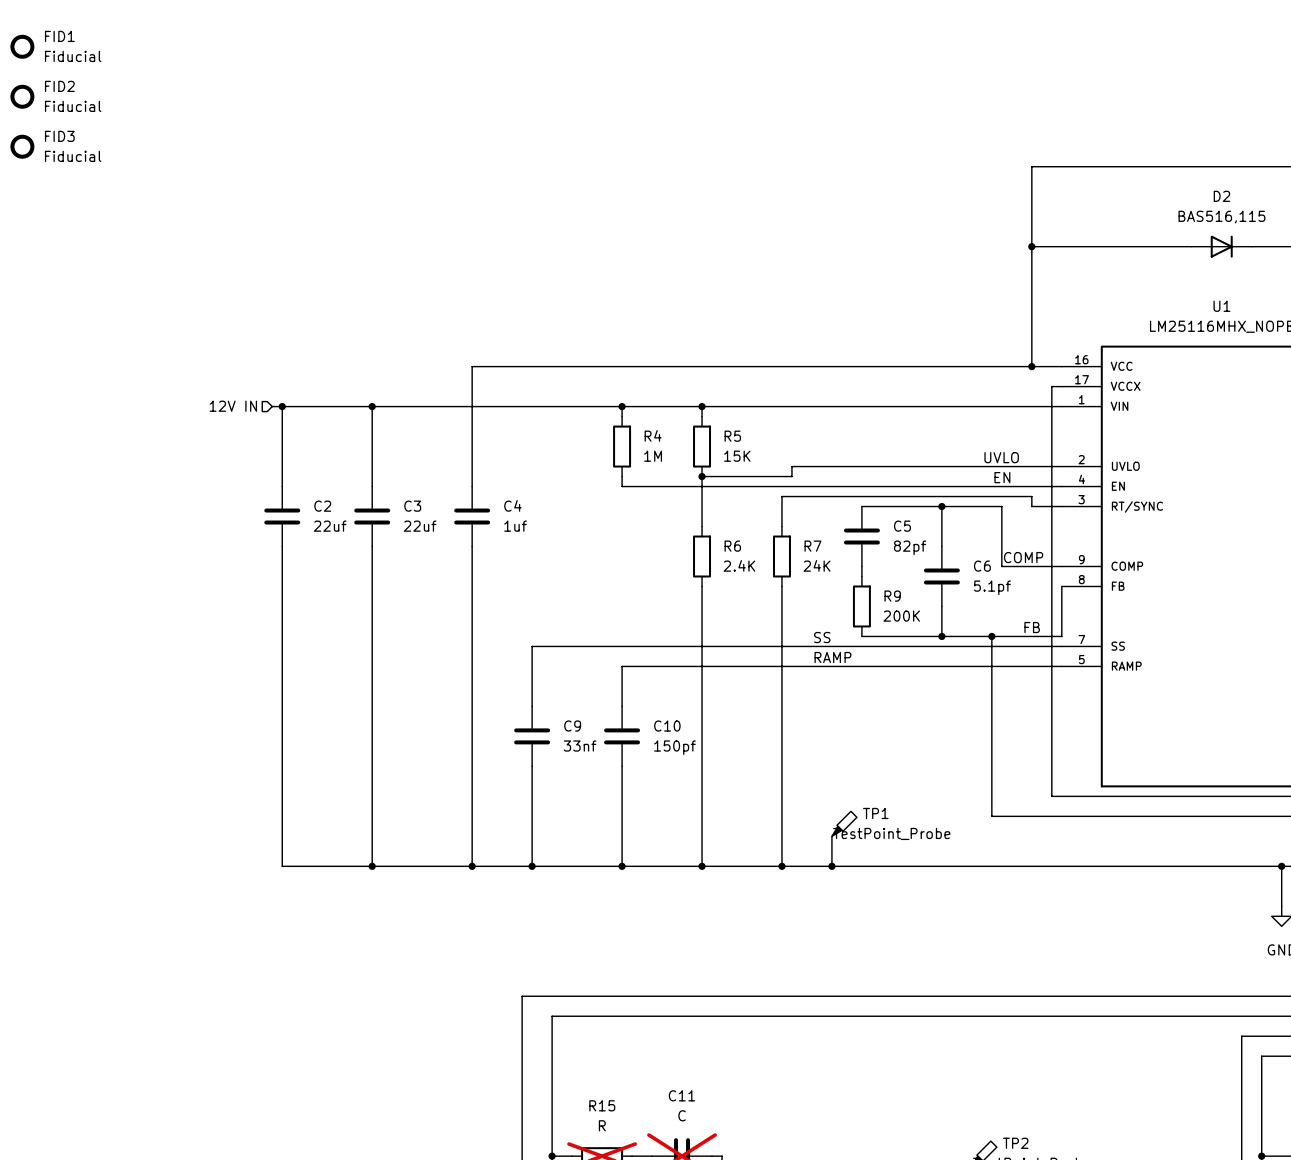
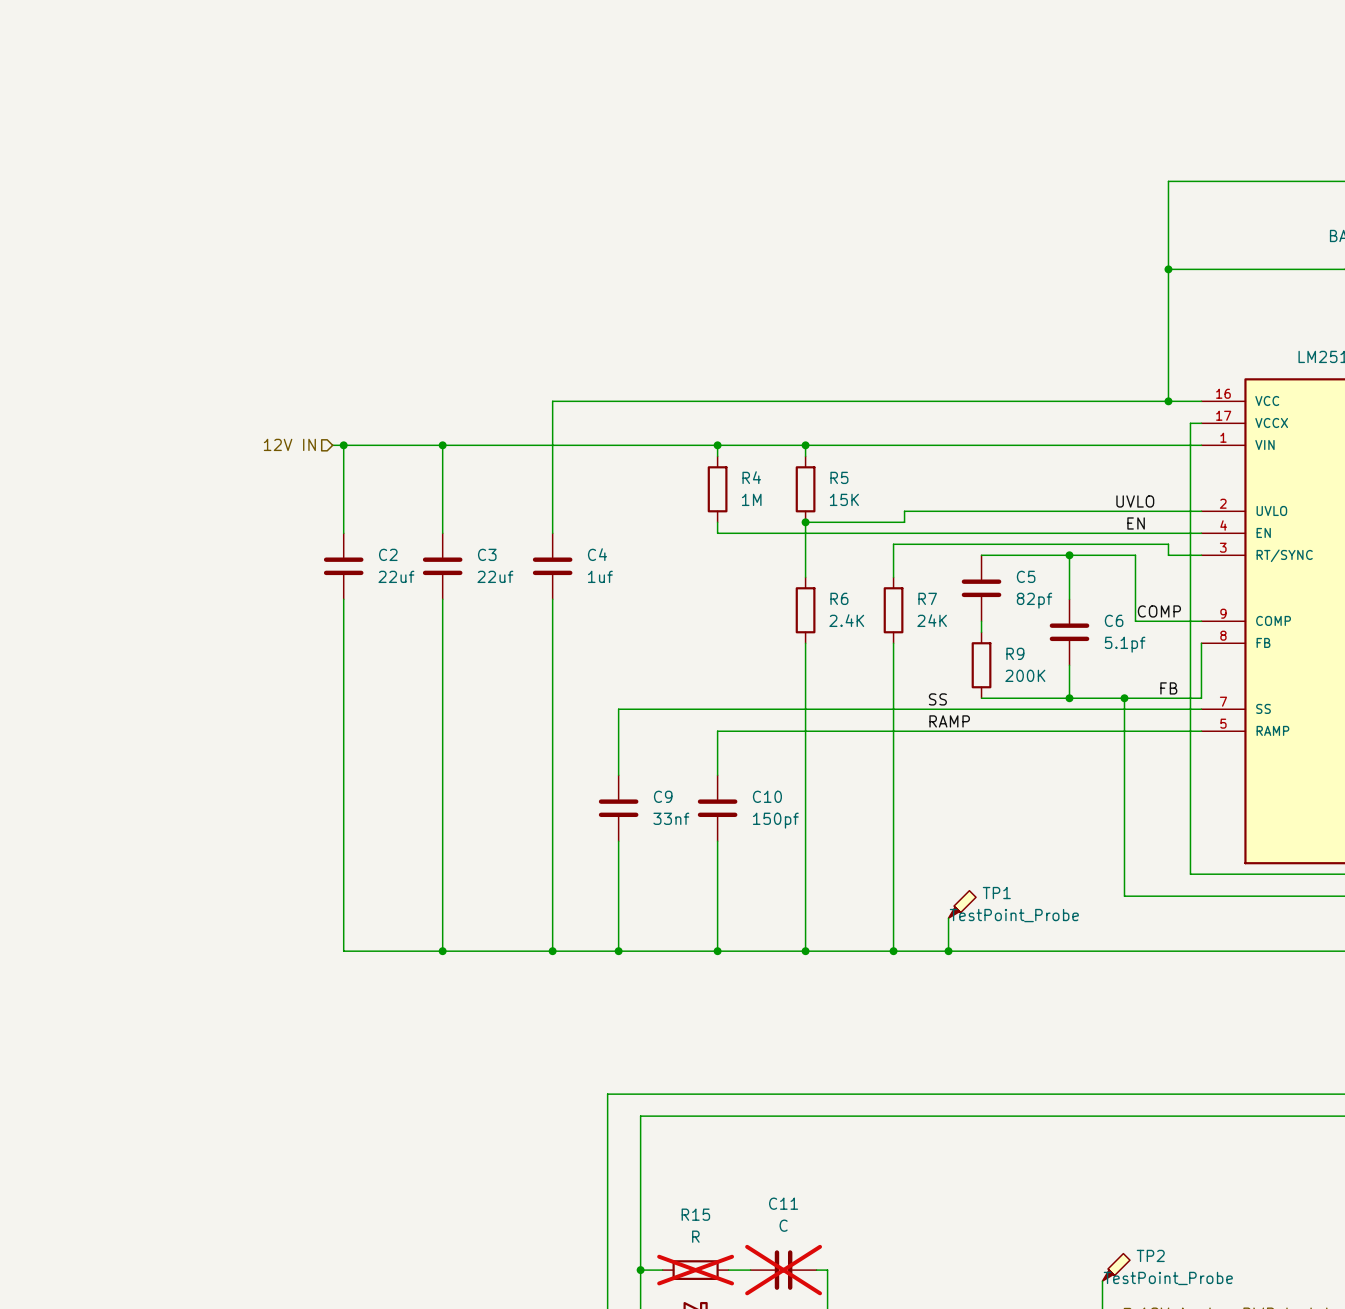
FID1: Fiducial (22, 46) -> none
FID2: Fiducial (22, 96) -> none
FID3: Fiducial (22, 146) -> none

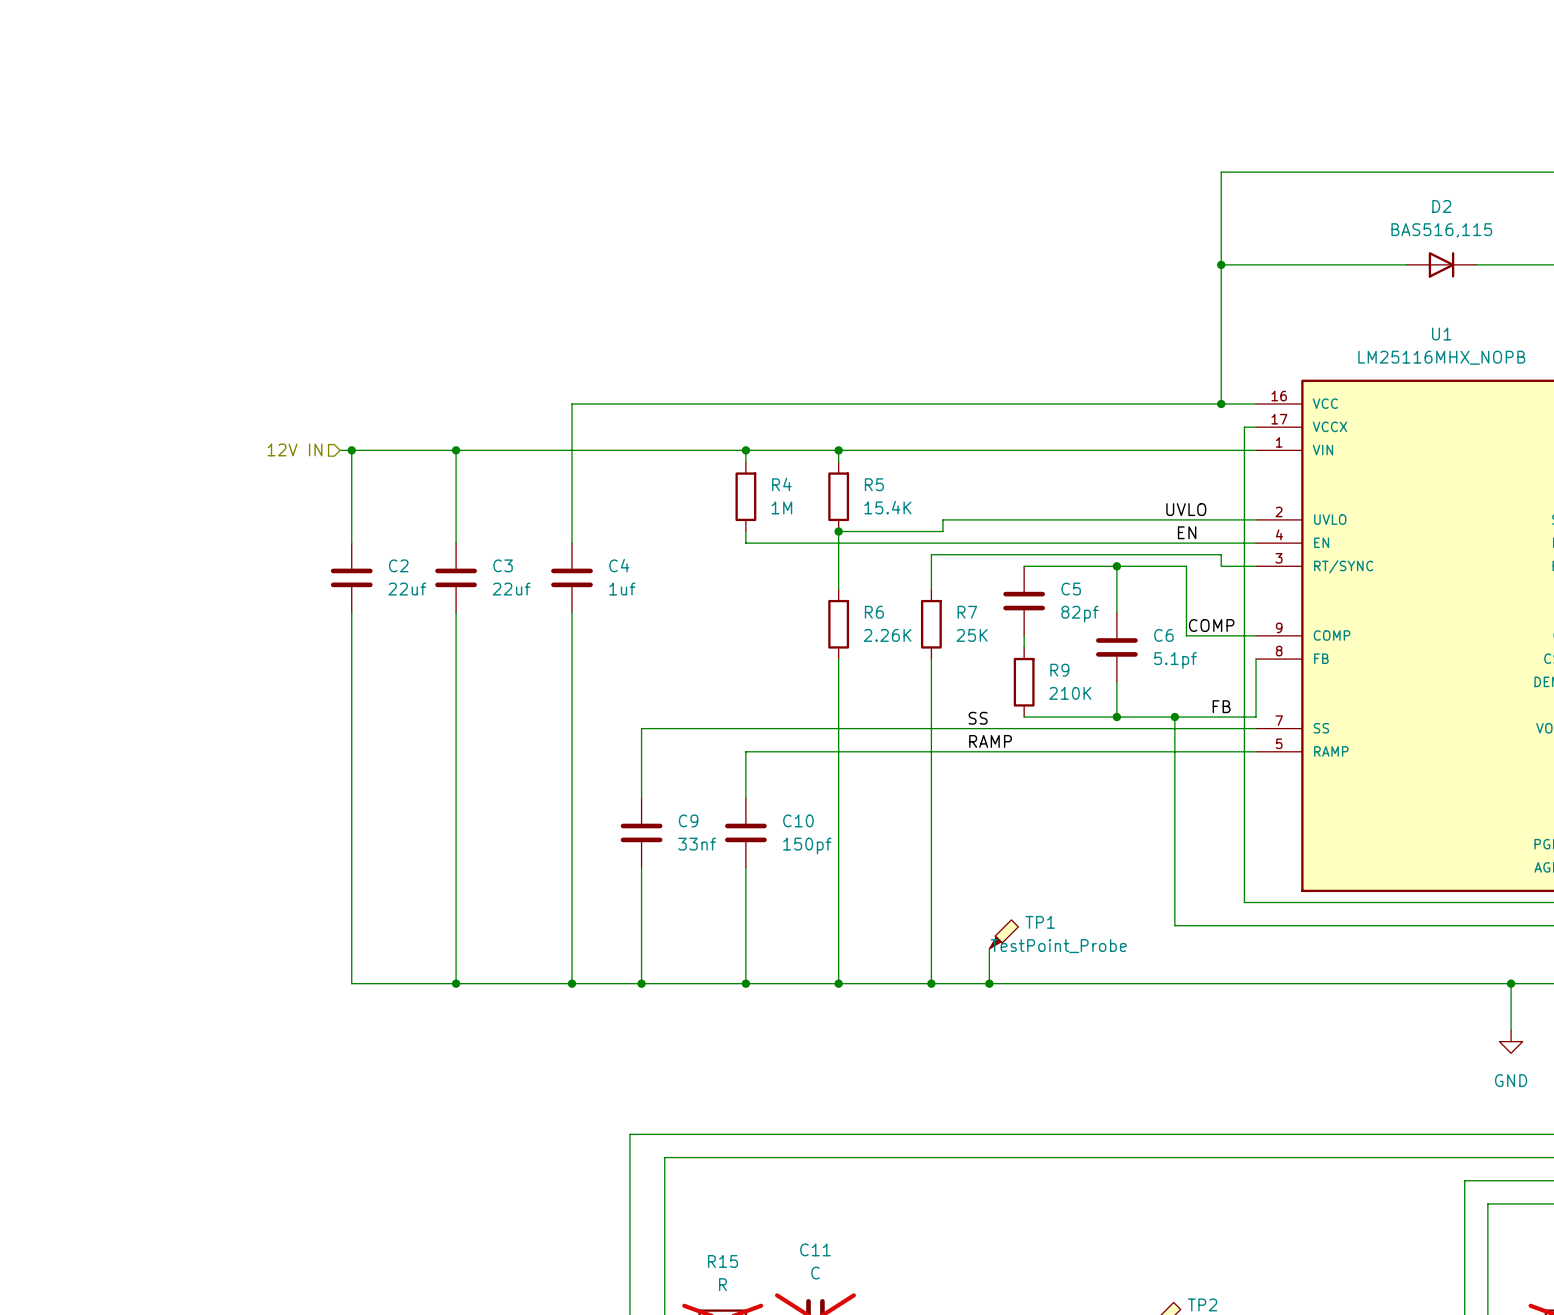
R5 value: 15K (844, 499) -> 15.4K (887, 507)
R6 value: 2.4K (846, 620) -> 2.26K (887, 635)
R7 value: 24K (932, 620) -> 25K (972, 635)
R9 value: 200K (1025, 675) -> 210K (1070, 693)

